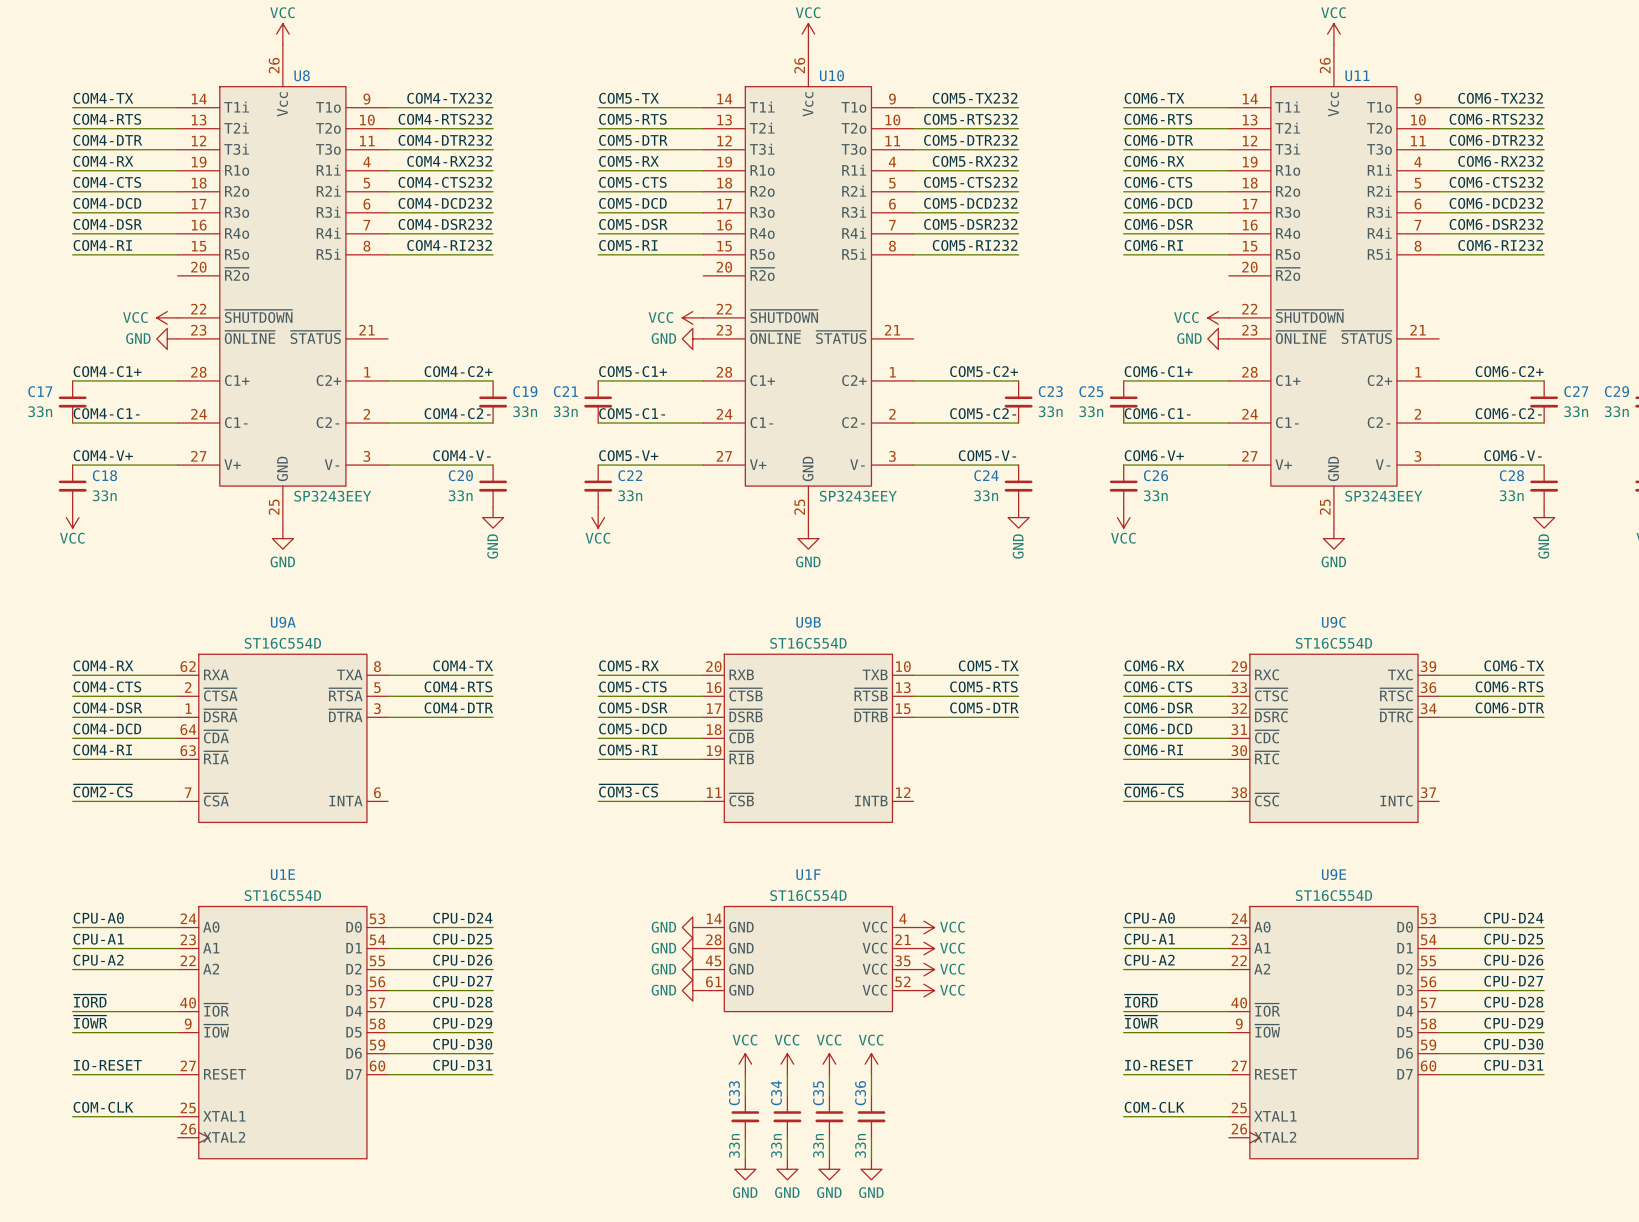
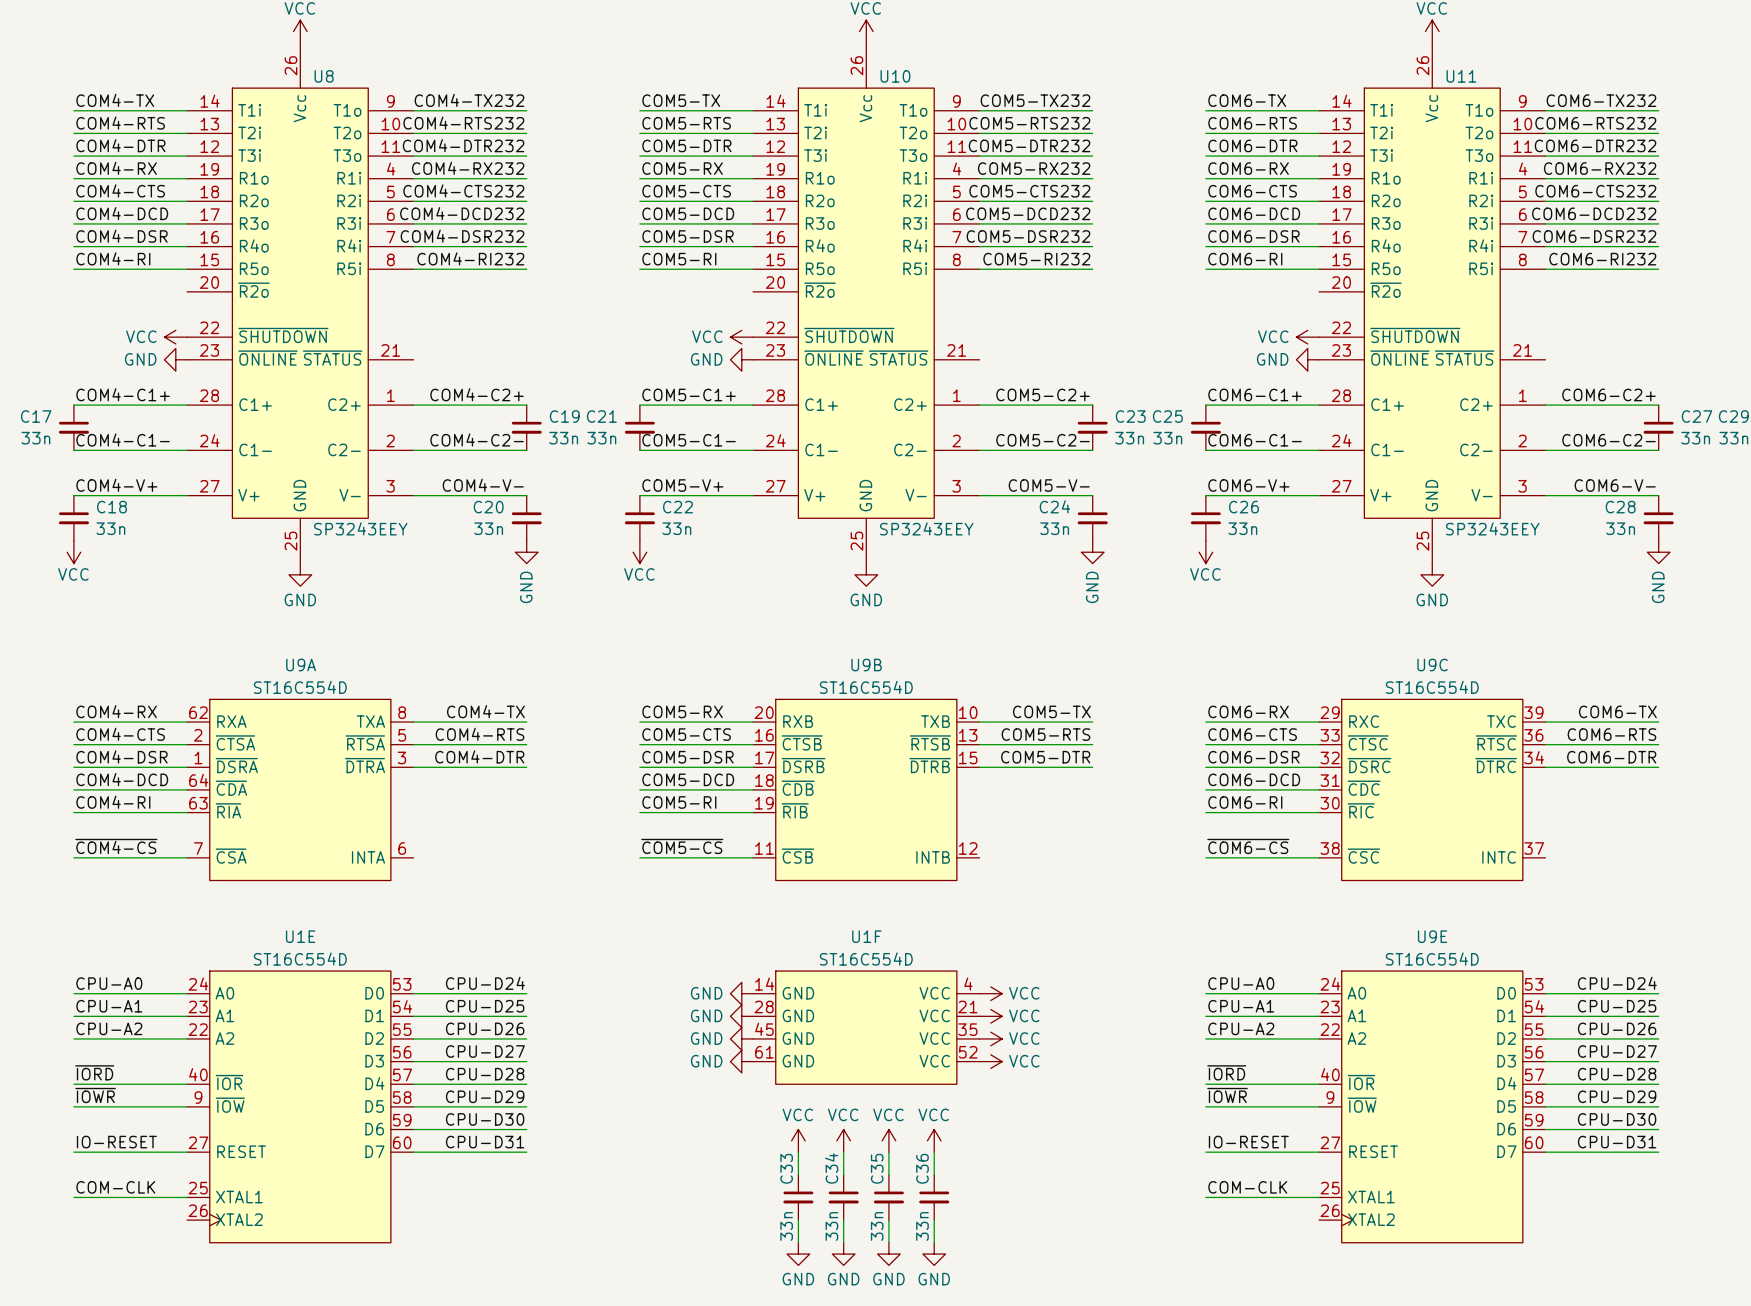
label: ~{COM2-CS} (103, 790) -> ~{COM4-CS} (116, 846)
label: ~{COM3-CS} (628, 790) -> ~{COM5-CS} (682, 846)

